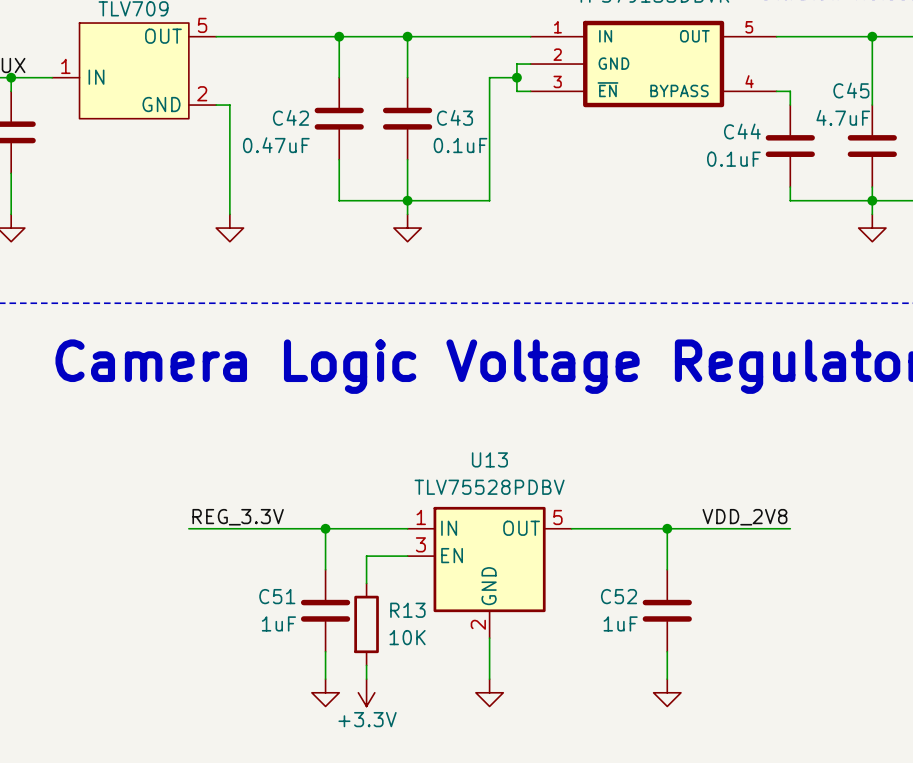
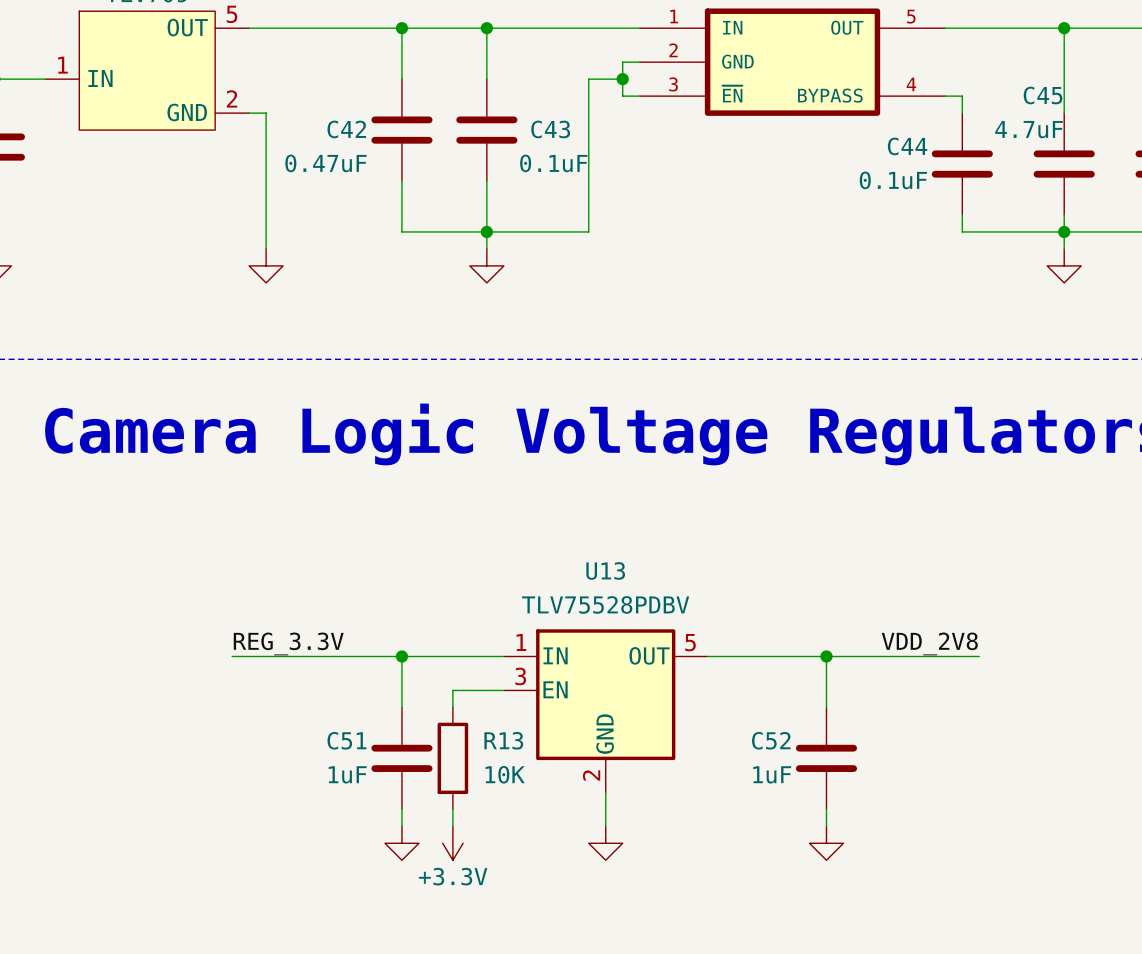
label position: REG_3.3V (238, 517) -> REG_3.3V (288, 643)
label position: VDD_2V8 (744, 517) -> VDD_2V8 (929, 643)
wire: (188, 528) (407, 528) -> (232, 656) (503, 656)
wire: (325, 528) (325, 569) -> (401, 656) (401, 707)
junction position: (325, 528) -> (401, 656)
wire: (571, 528) (790, 528) -> (707, 656) (979, 656)
wire: (667, 528) (667, 569) -> (826, 656) (826, 707)
junction position: (667, 528) -> (826, 656)
wire: (407, 556) (366, 556) (366, 583) -> none
wire: none -> (503, 690) (452, 690) (452, 707)
U13 position: (489, 572) -> (605, 710)
C51 position: (325, 610) -> (401, 758)
C52 position: (667, 610) -> (826, 758)
R13 position: (366, 624) -> (452, 758)
wire: (489, 638) (489, 679) -> none
wire: (325, 651) (325, 679) -> none
wire: (667, 651) (667, 679) -> (605, 792) (605, 826)
wire: none -> (401, 809) (401, 826)
wire: (366, 665) (366, 679) -> (452, 809) (452, 826)
wire: none -> (826, 809) (826, 826)
power symbol position: (325, 692) -> (401, 843)
power symbol position: +3.3V (366, 692) -> +3.3V (452, 843)
power symbol position: (489, 692) -> (605, 843)
power symbol position: (667, 692) -> (826, 843)

